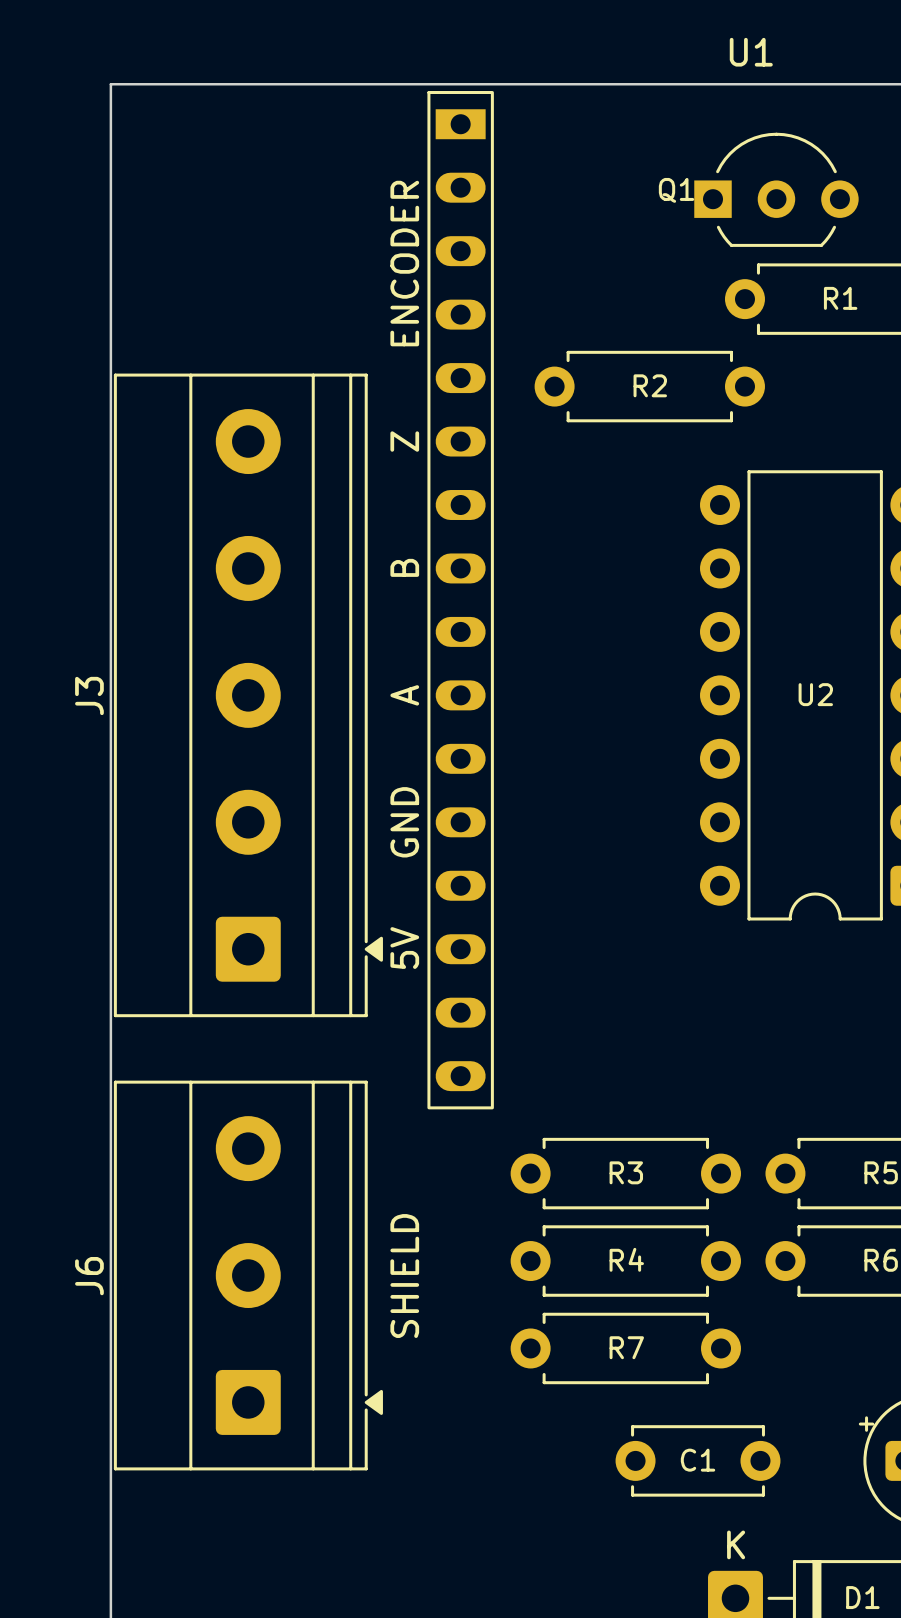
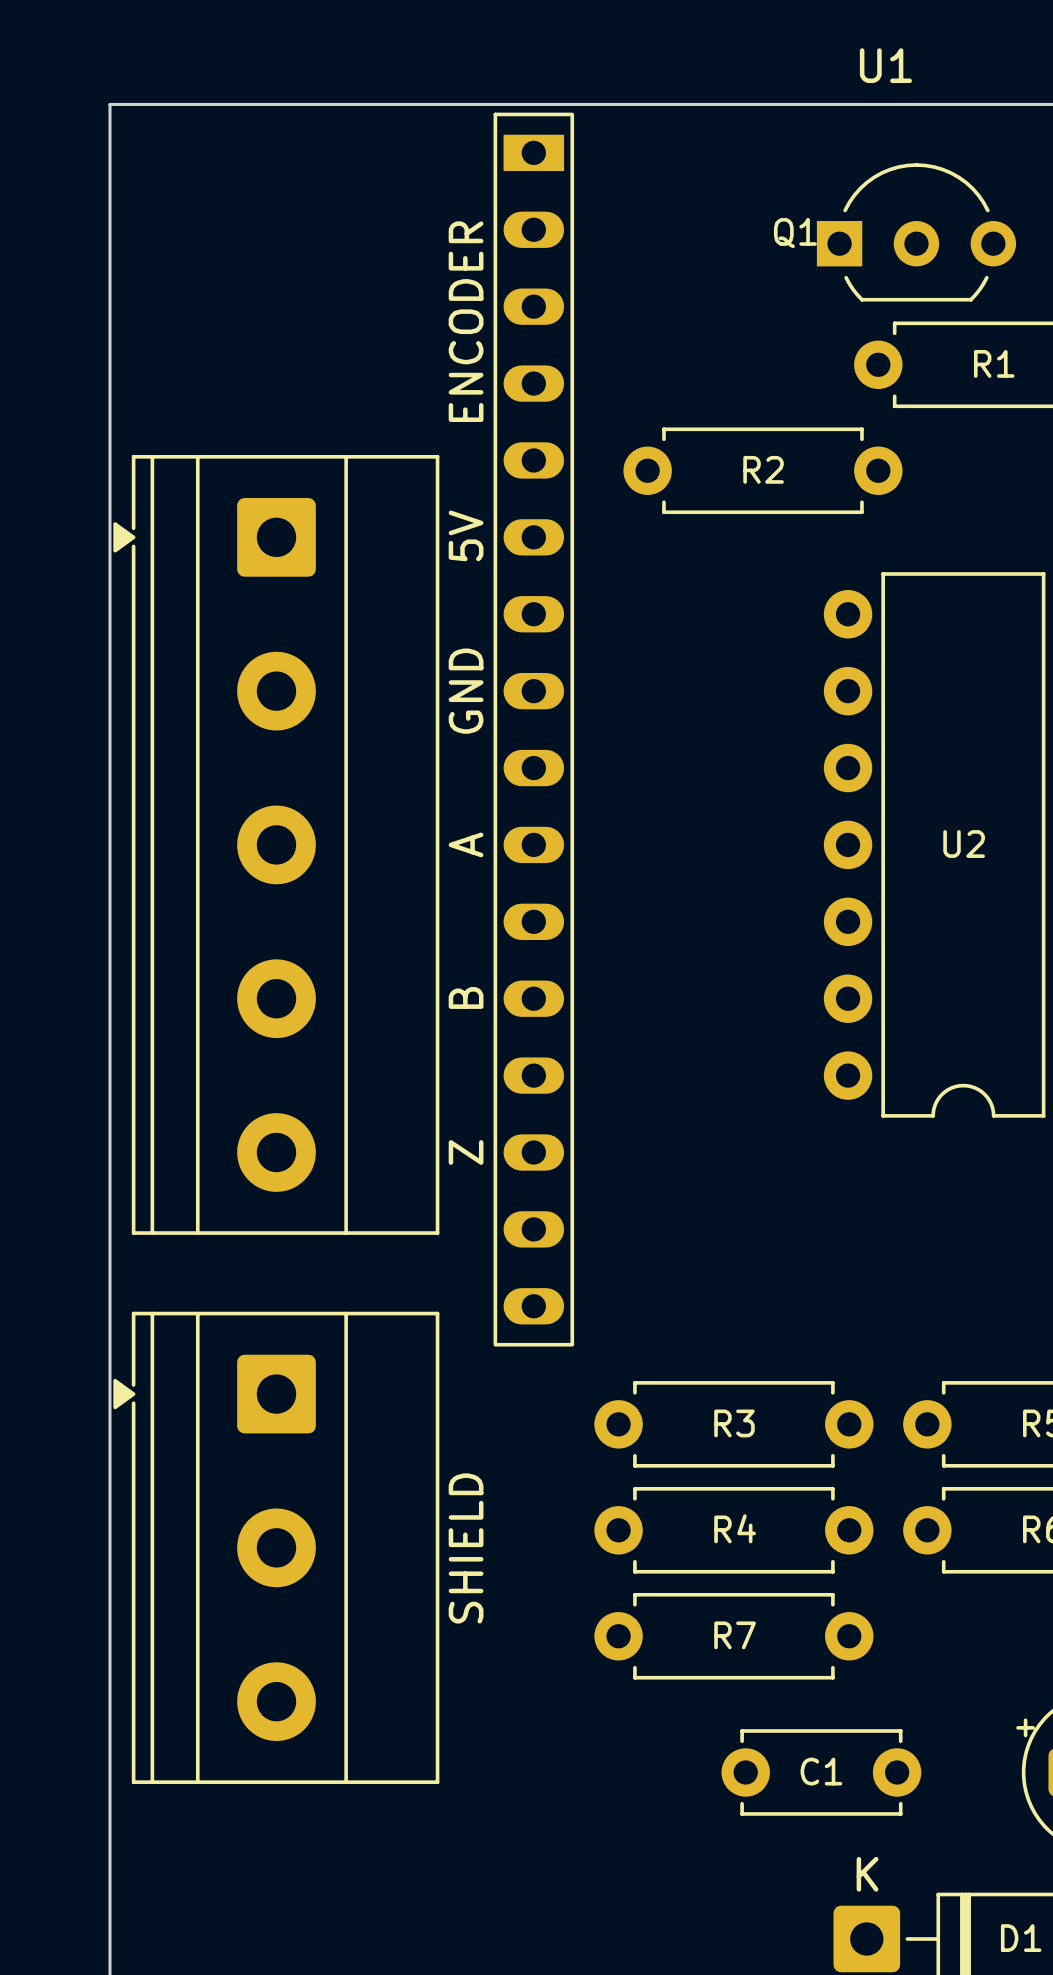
text: Z (404, 441) -> 5V (466, 535)
text: B (404, 567) -> GND (466, 691)
J3: (248, 695) -> none
part: none -> (276, 844)
text: GND (404, 822) -> B (466, 997)
text: 5V (404, 948) -> Z (466, 1152)
J6: (248, 1275) -> none
part: none -> (276, 1547)

